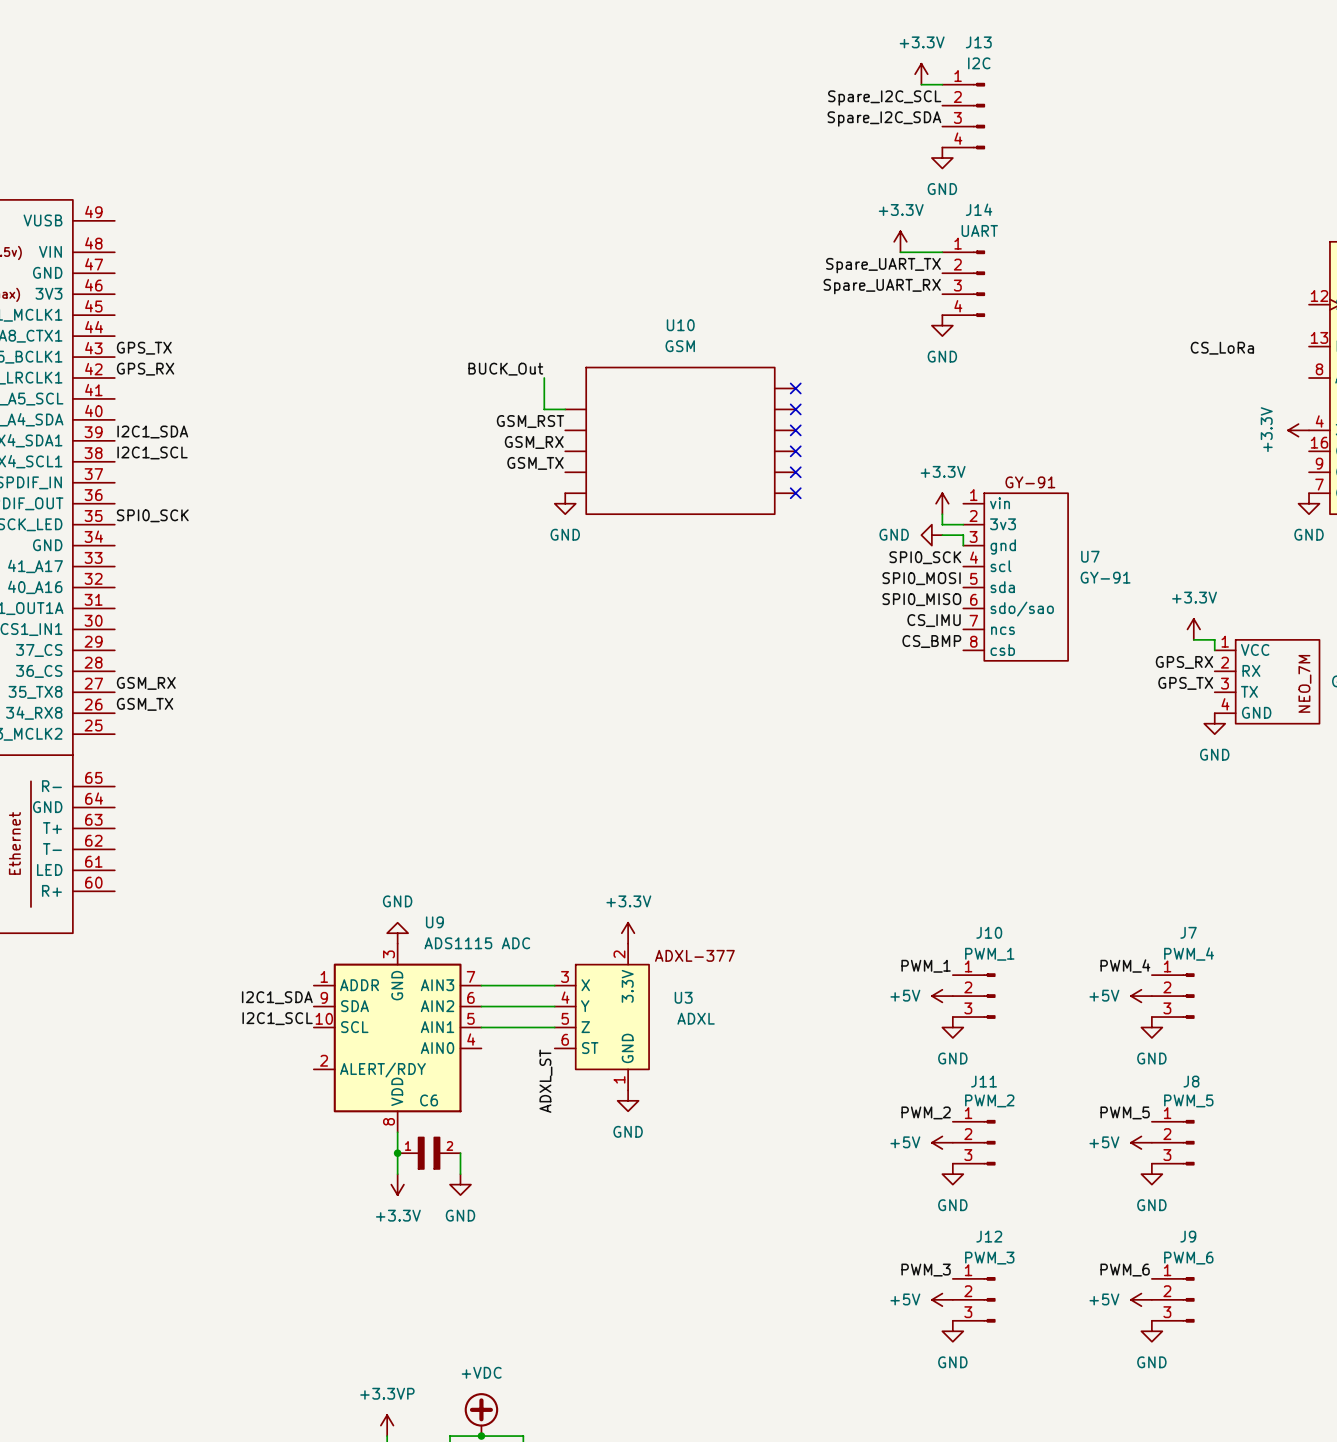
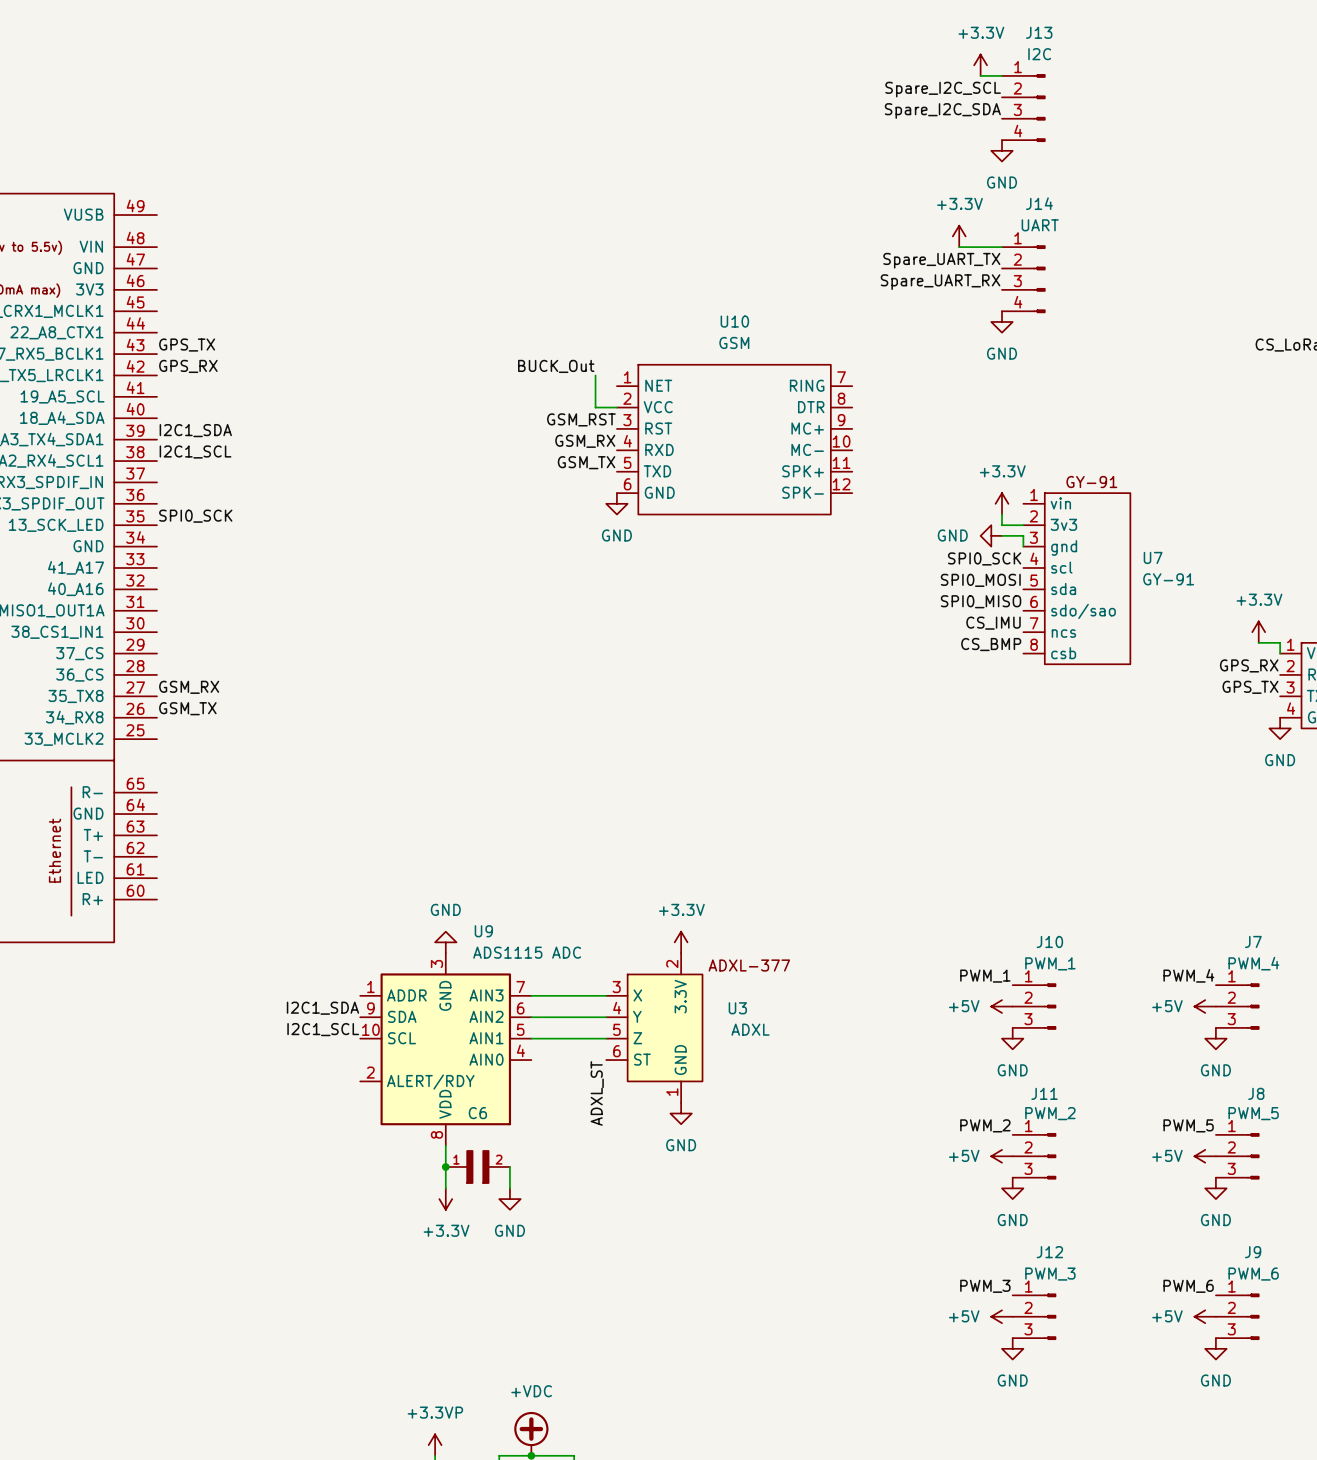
U10 symbol: [565, 367, 796, 515] -> [616, 364, 853, 515]
no-connect mark: (795, 388) -> none
no-connect mark: (795, 409) -> none
no-connect mark: (795, 430) -> none
no-connect mark: (795, 451) -> none
no-connect mark: (795, 472) -> none
no-connect mark: (795, 493) -> none

